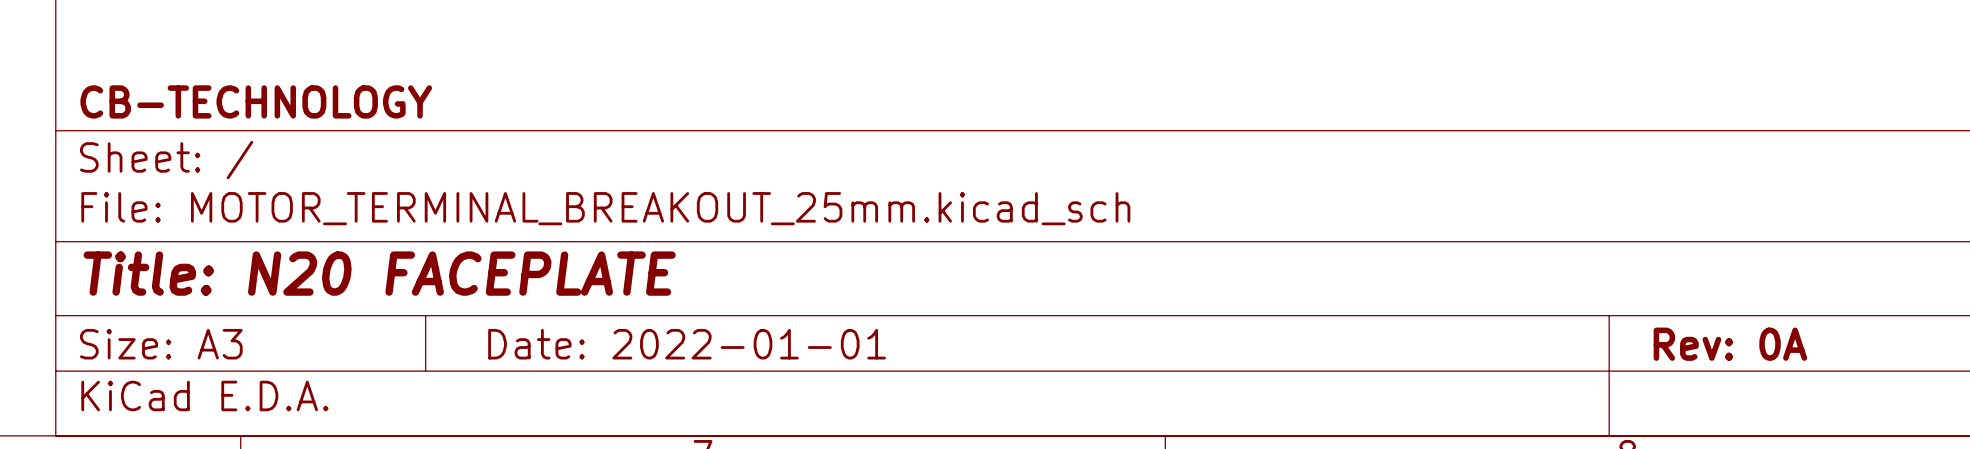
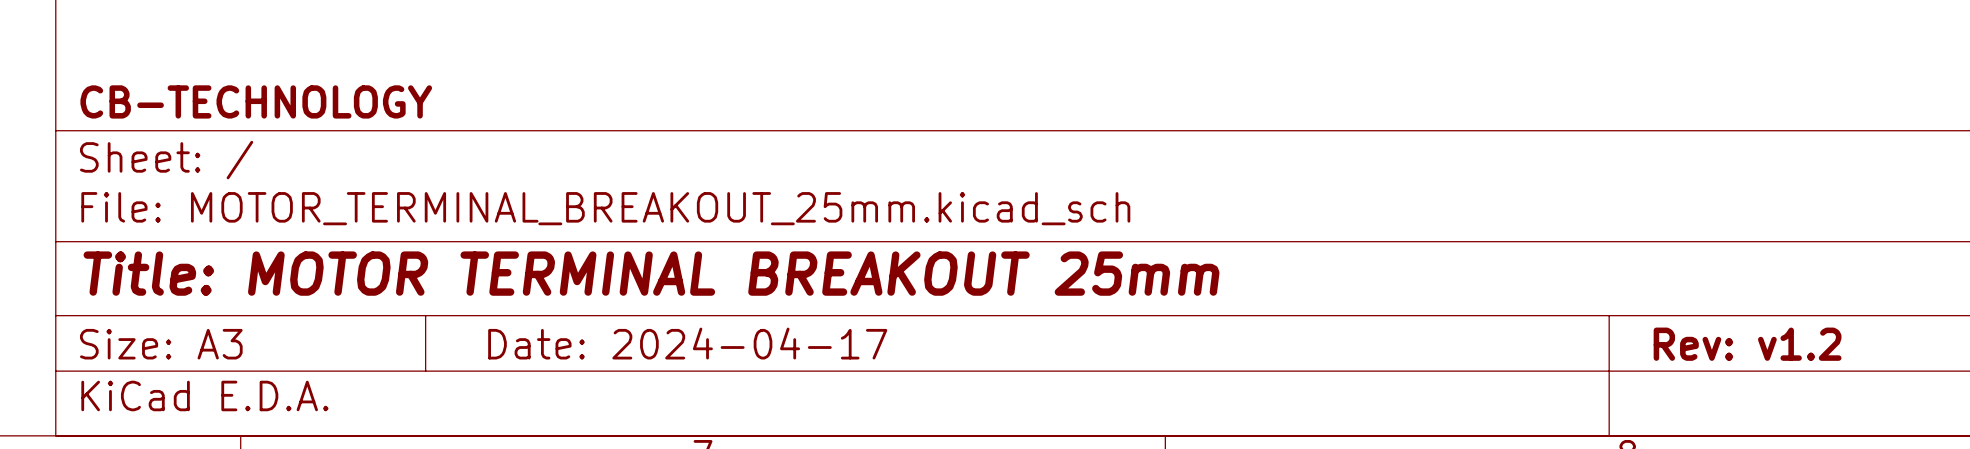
title block: Title: N20 FACEPLATE (379, 273) -> Title: MOTOR TERMINAL BREAKOUT 25mm (651, 273)
title block: Date: 2022-01-01 (687, 344) -> Date: 2024-04-17 (687, 343)
title block: Rev: 0A (1730, 344) -> Rev: v1.2 (1747, 344)

